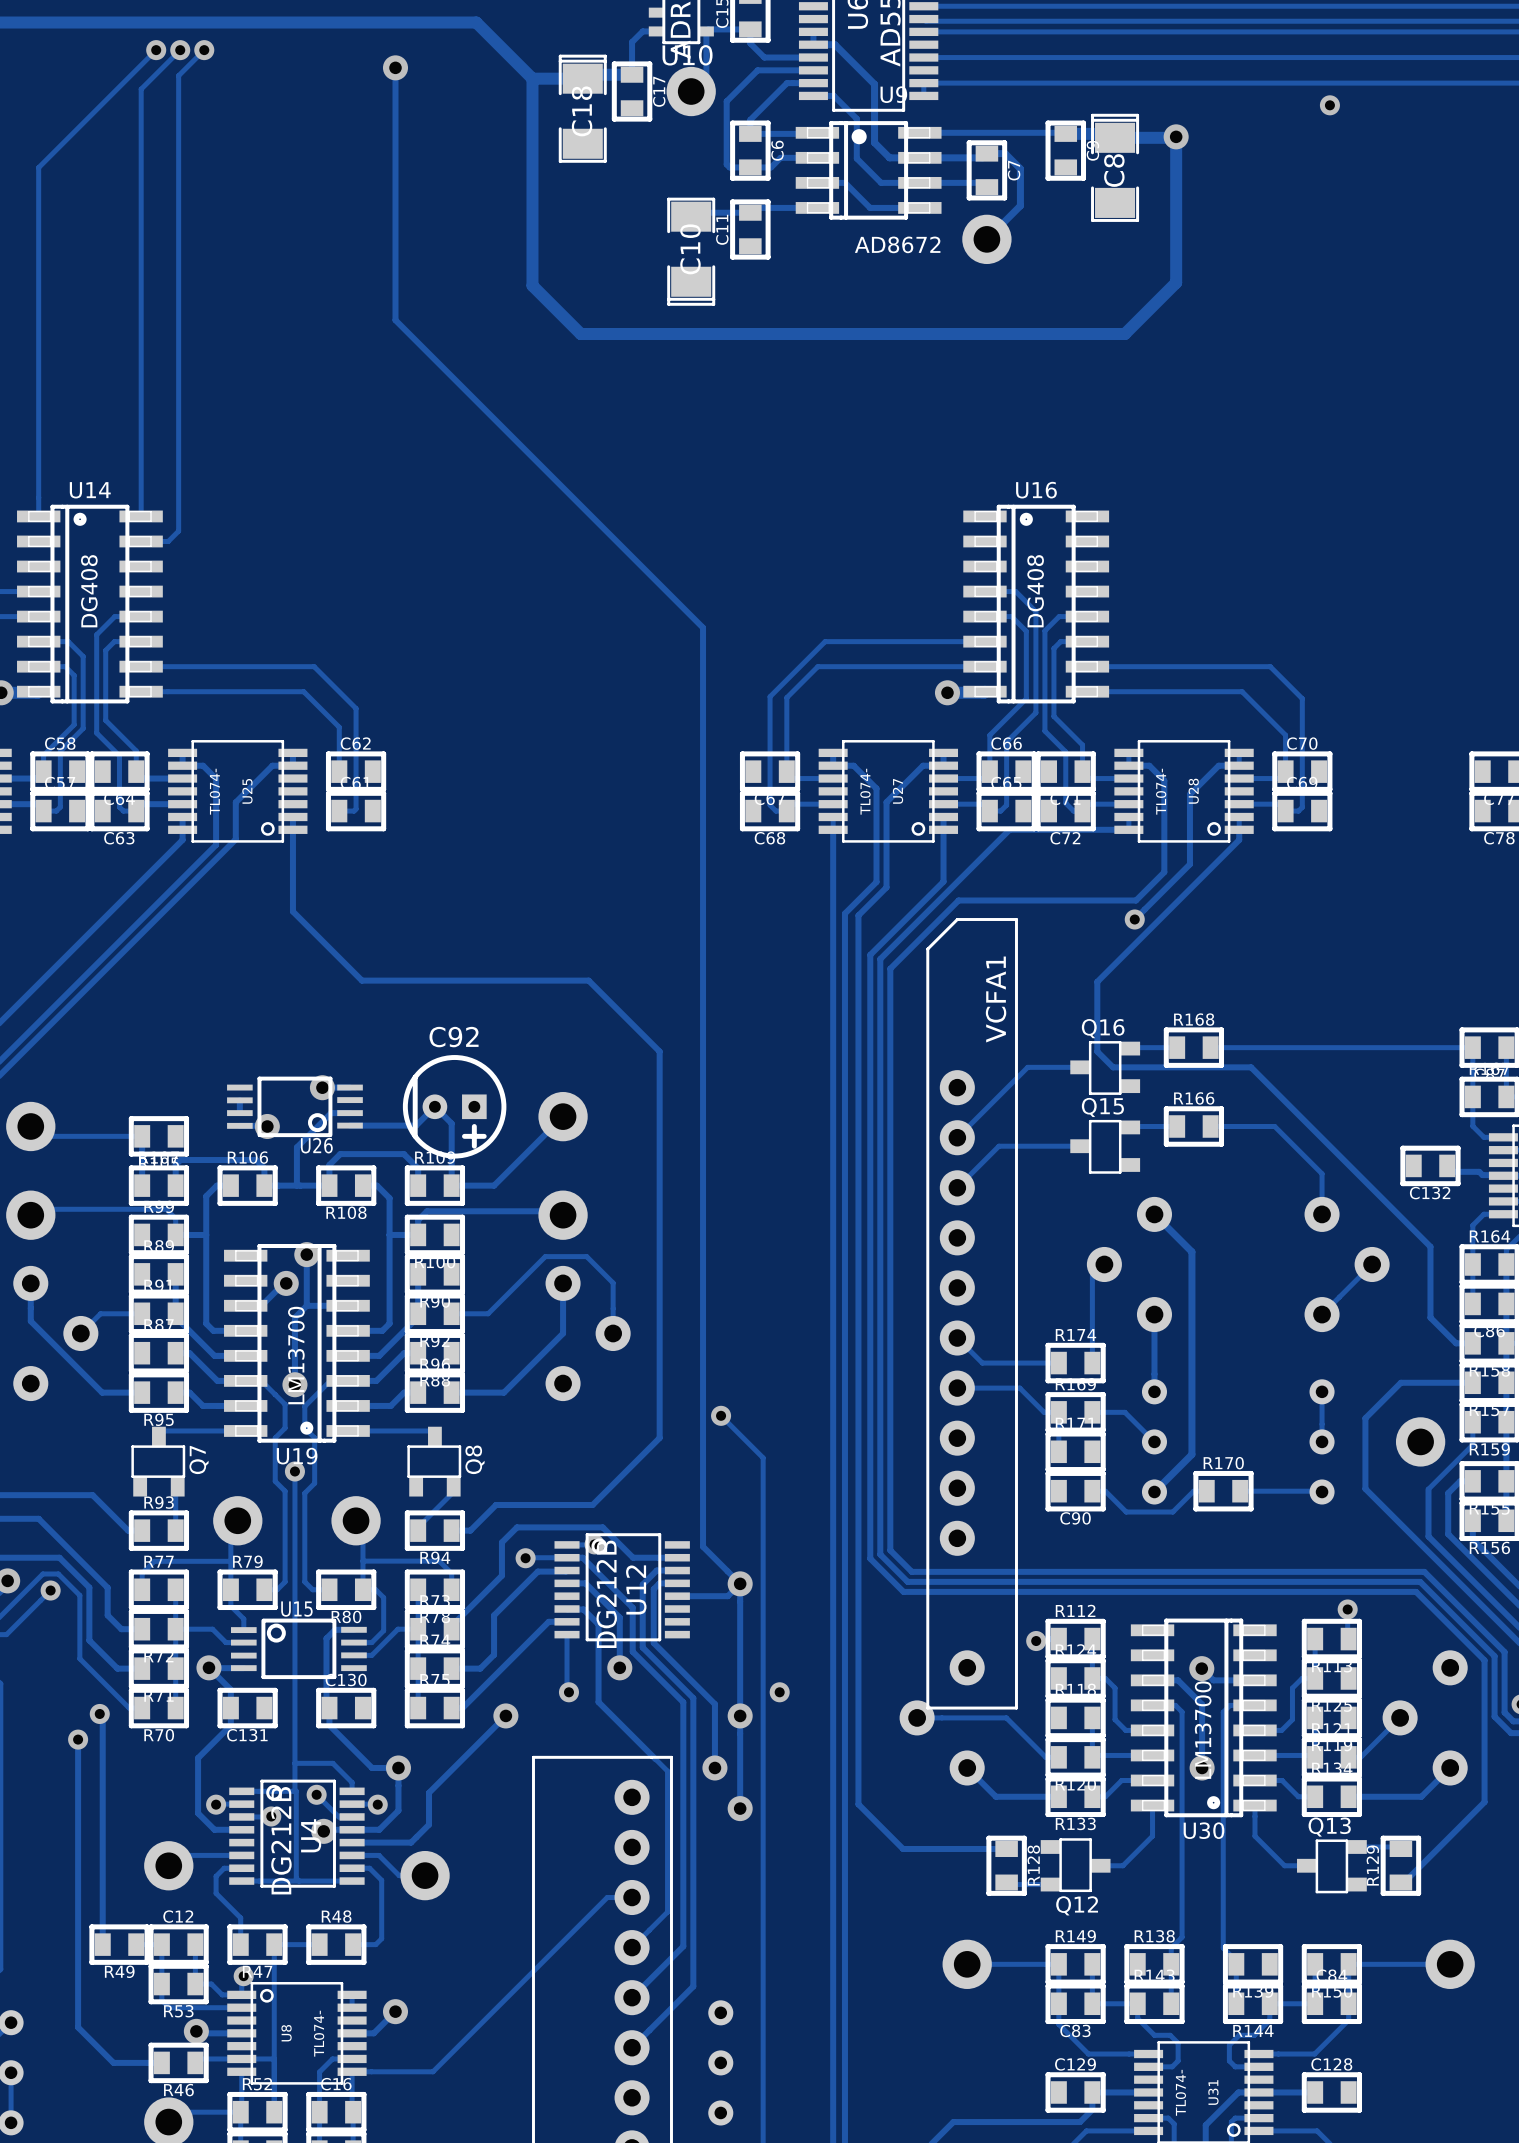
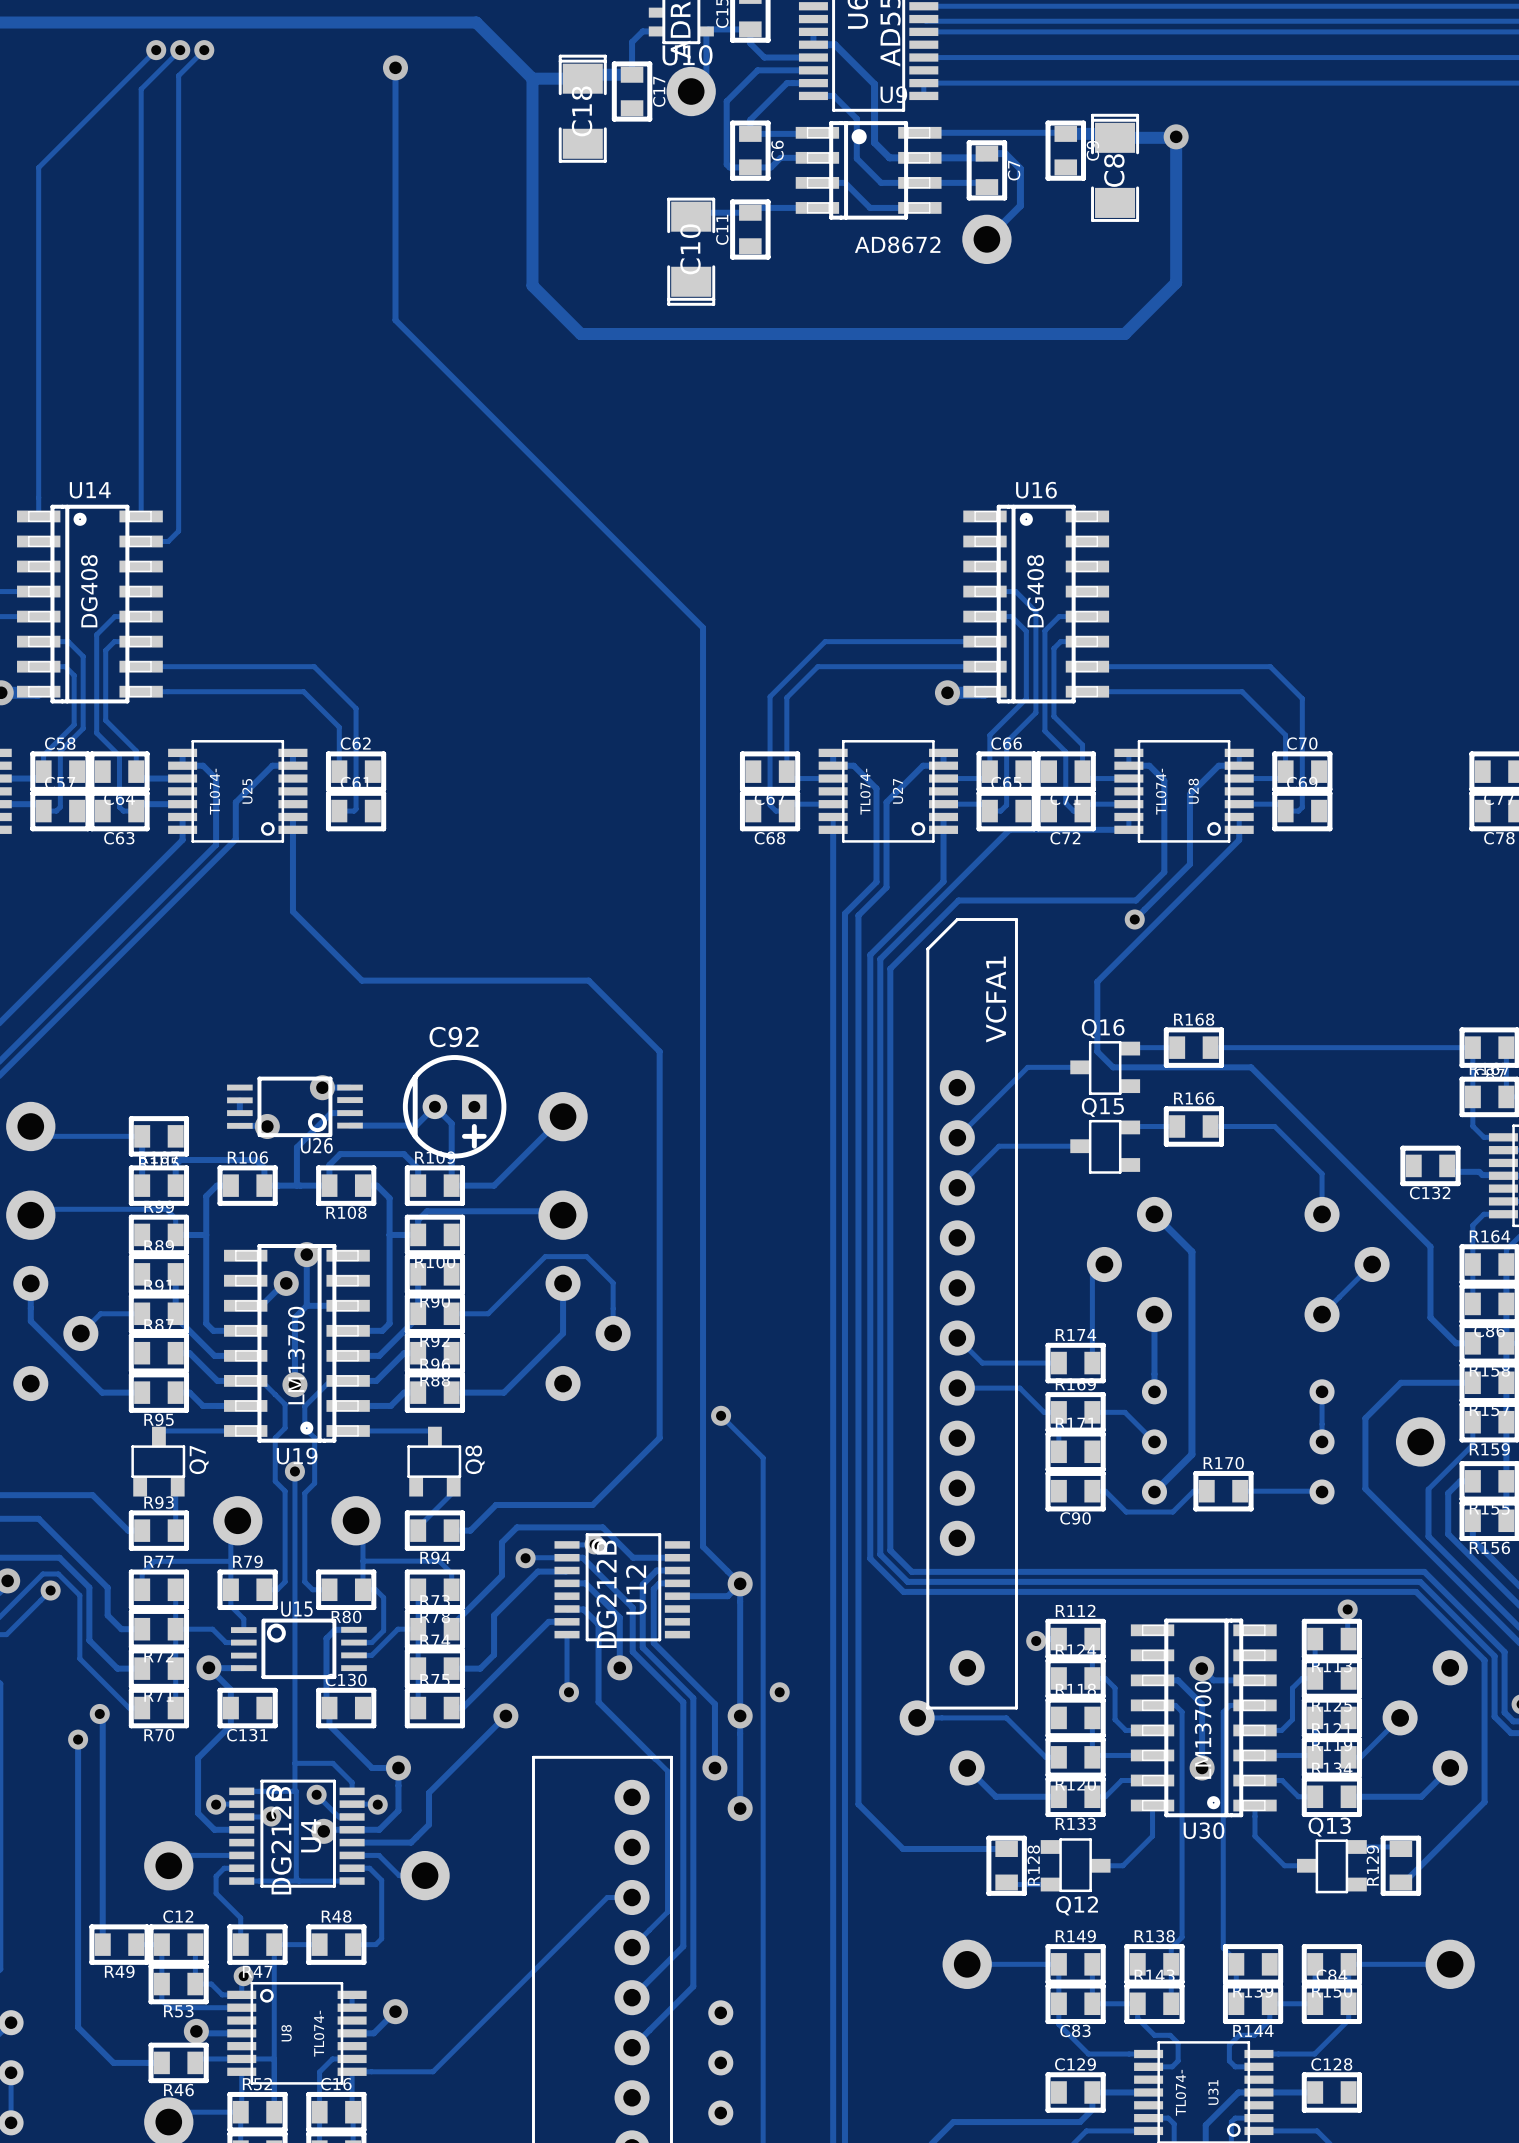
via: (1329, 105) -> none

